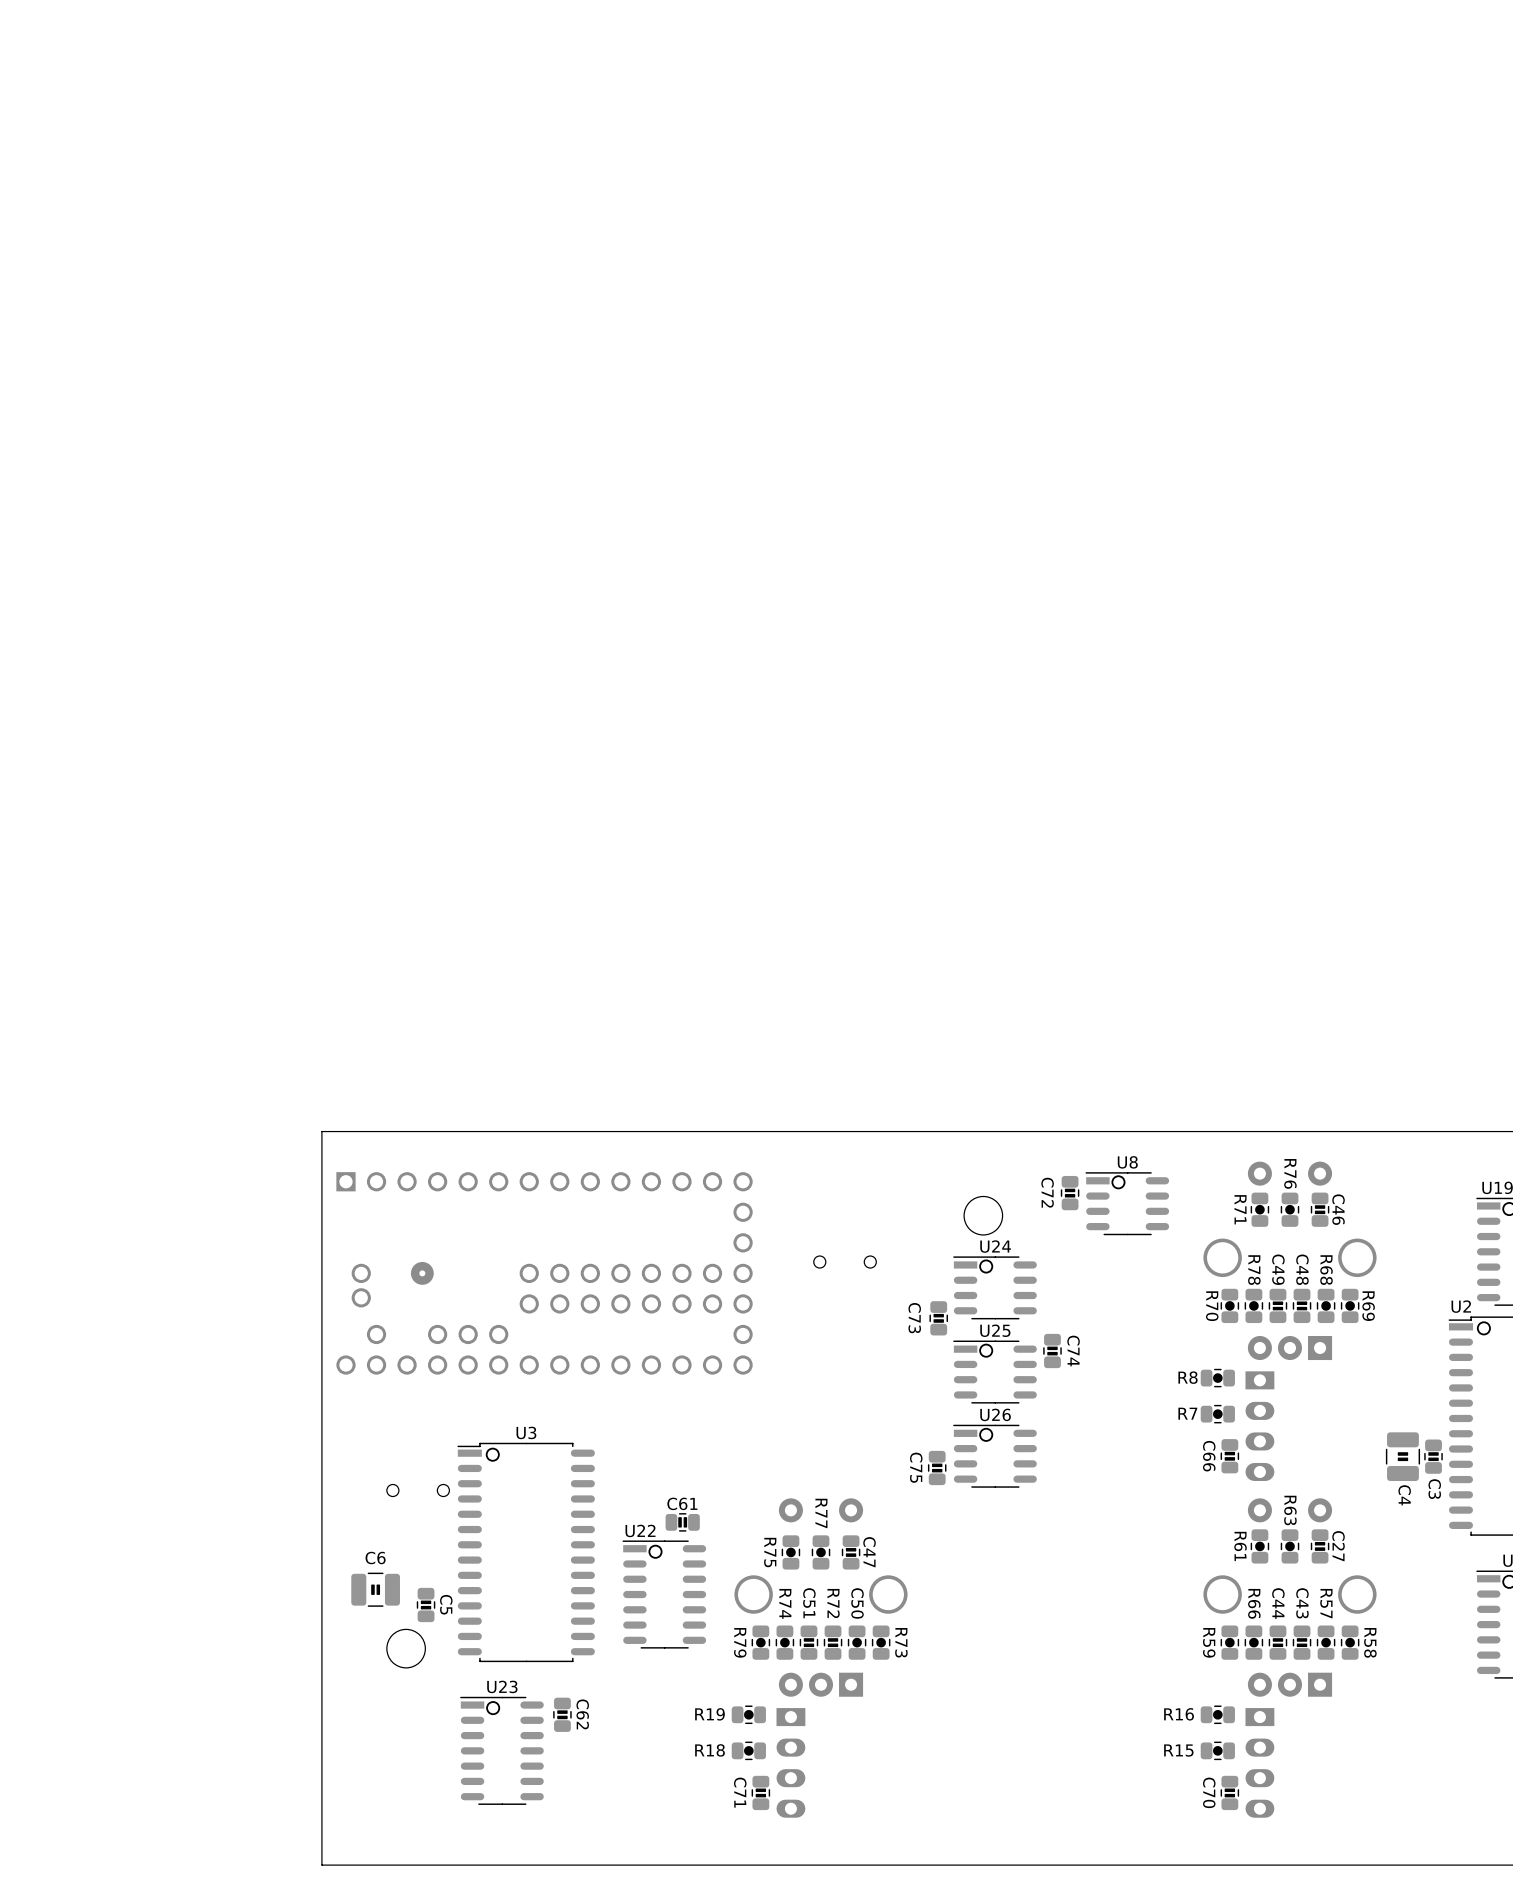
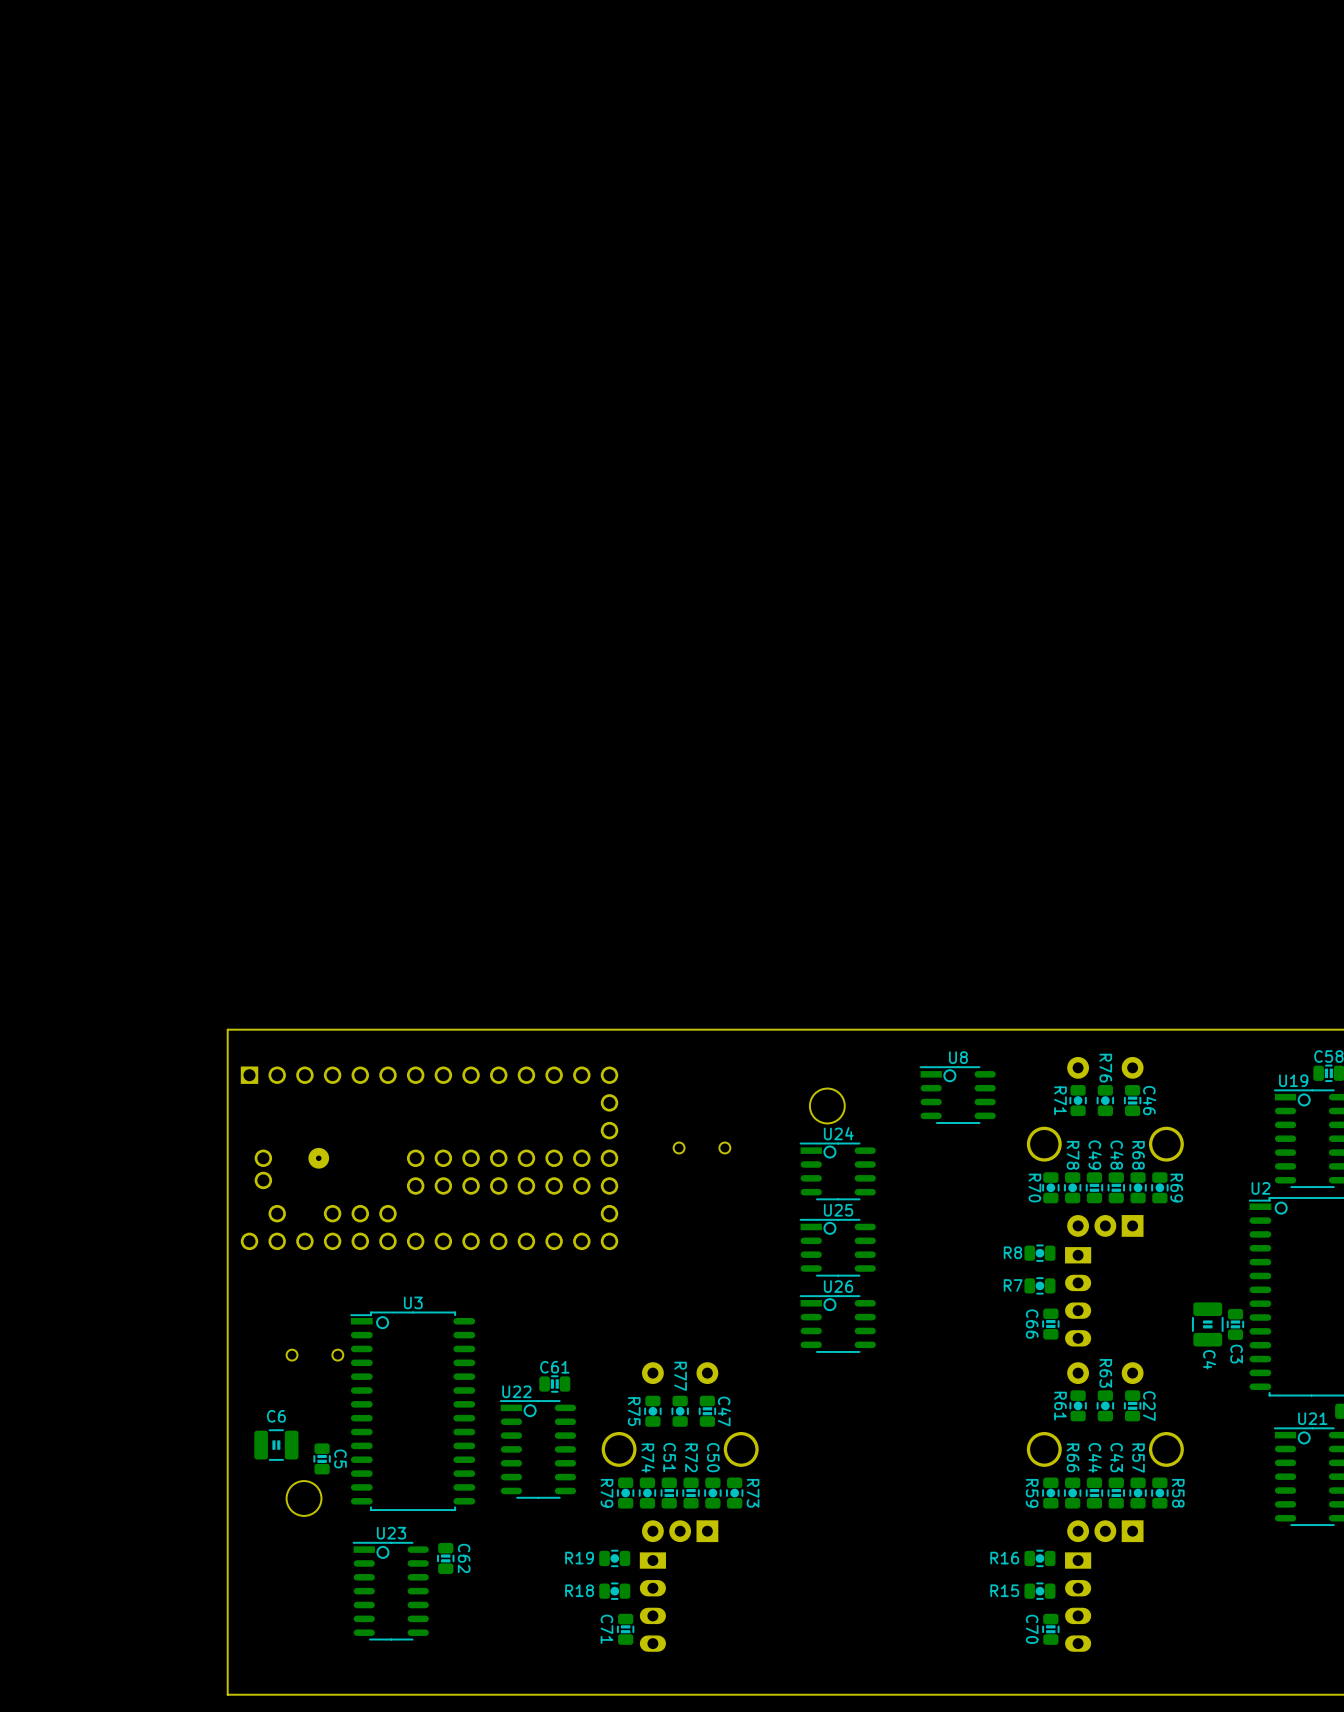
C72: (1070, 1193) -> none
C73: (938, 1318) -> none
C74: (1052, 1351) -> none
C75: (937, 1468) -> none

